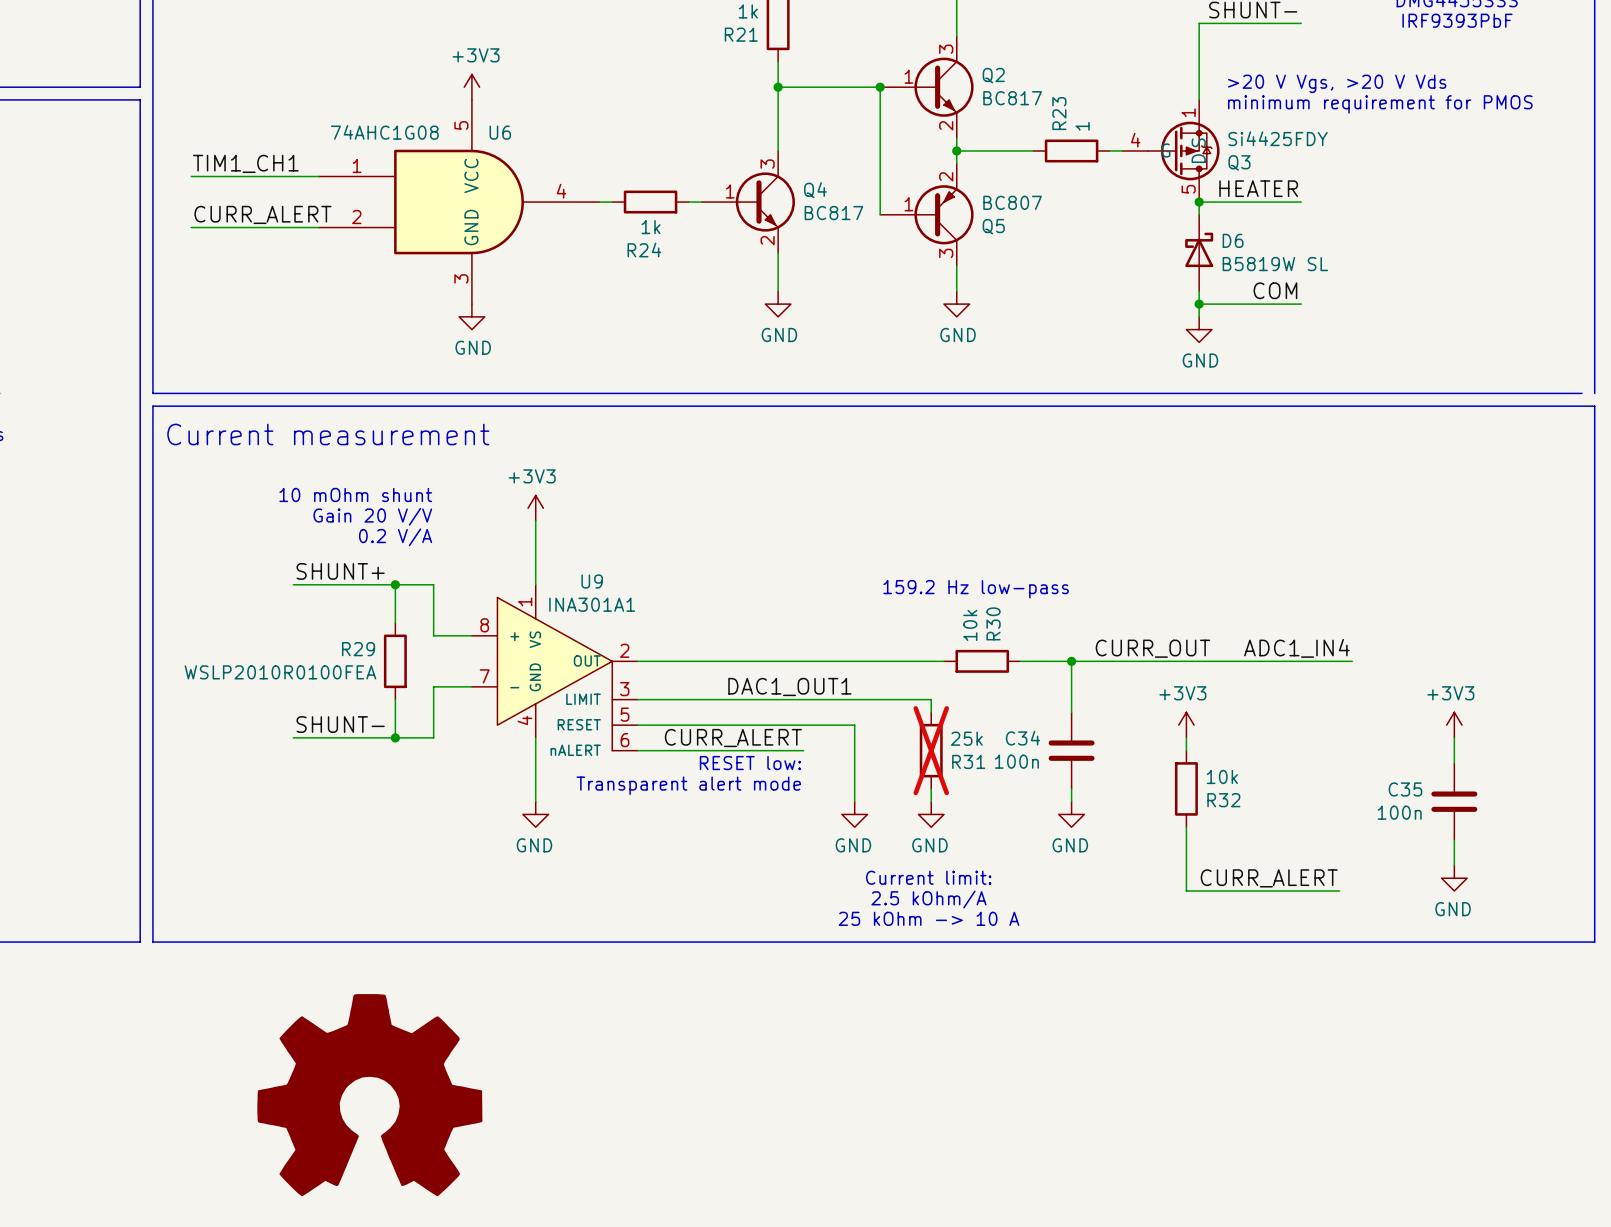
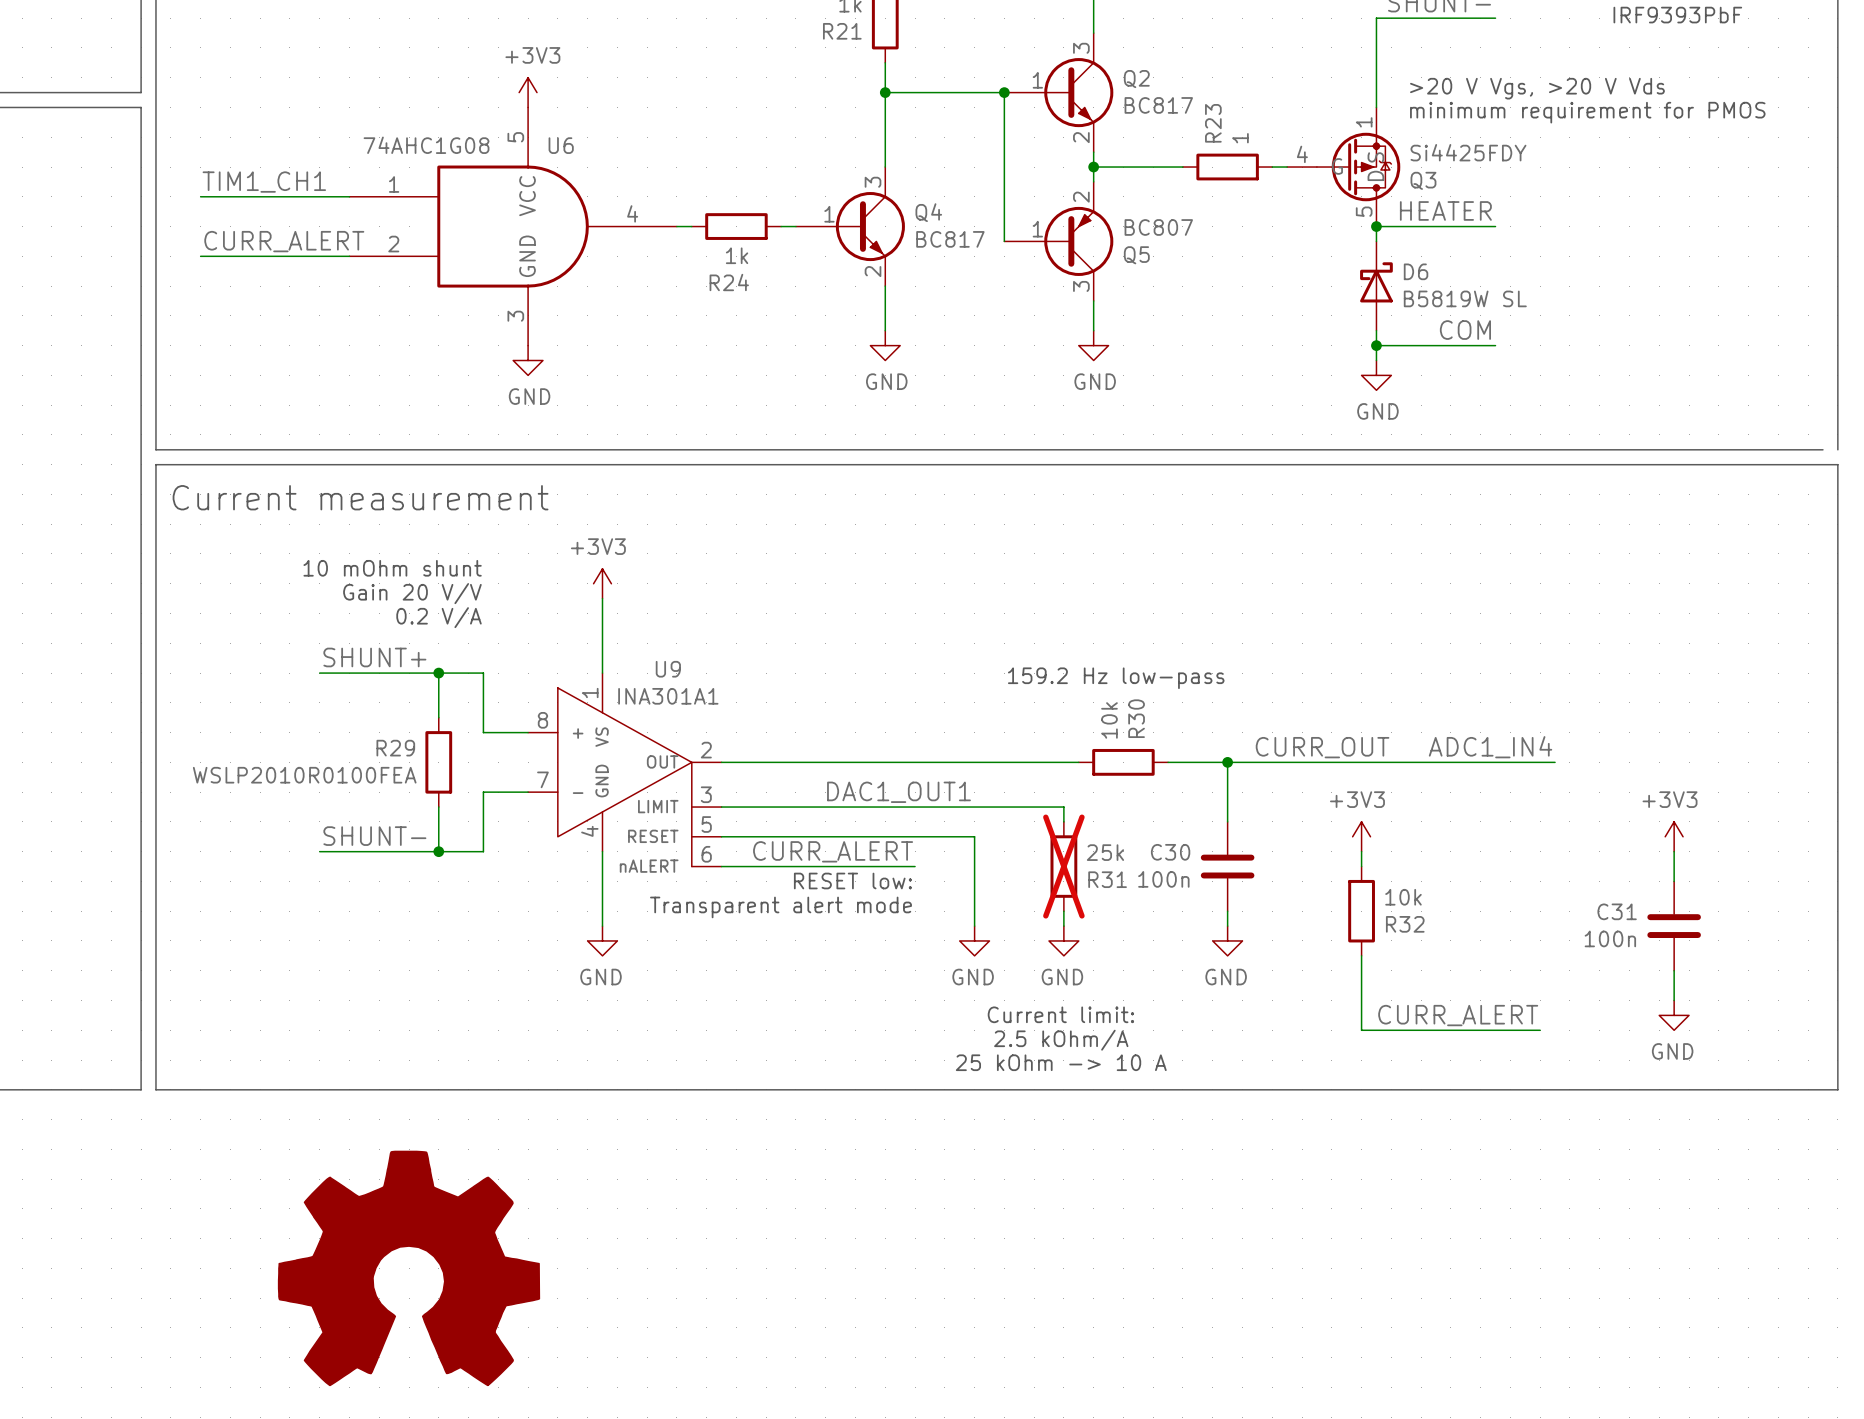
C34 name: C34 (1023, 738) -> C30 (1170, 852)
C35 name: C35 (1405, 789) -> C31 (1617, 911)

